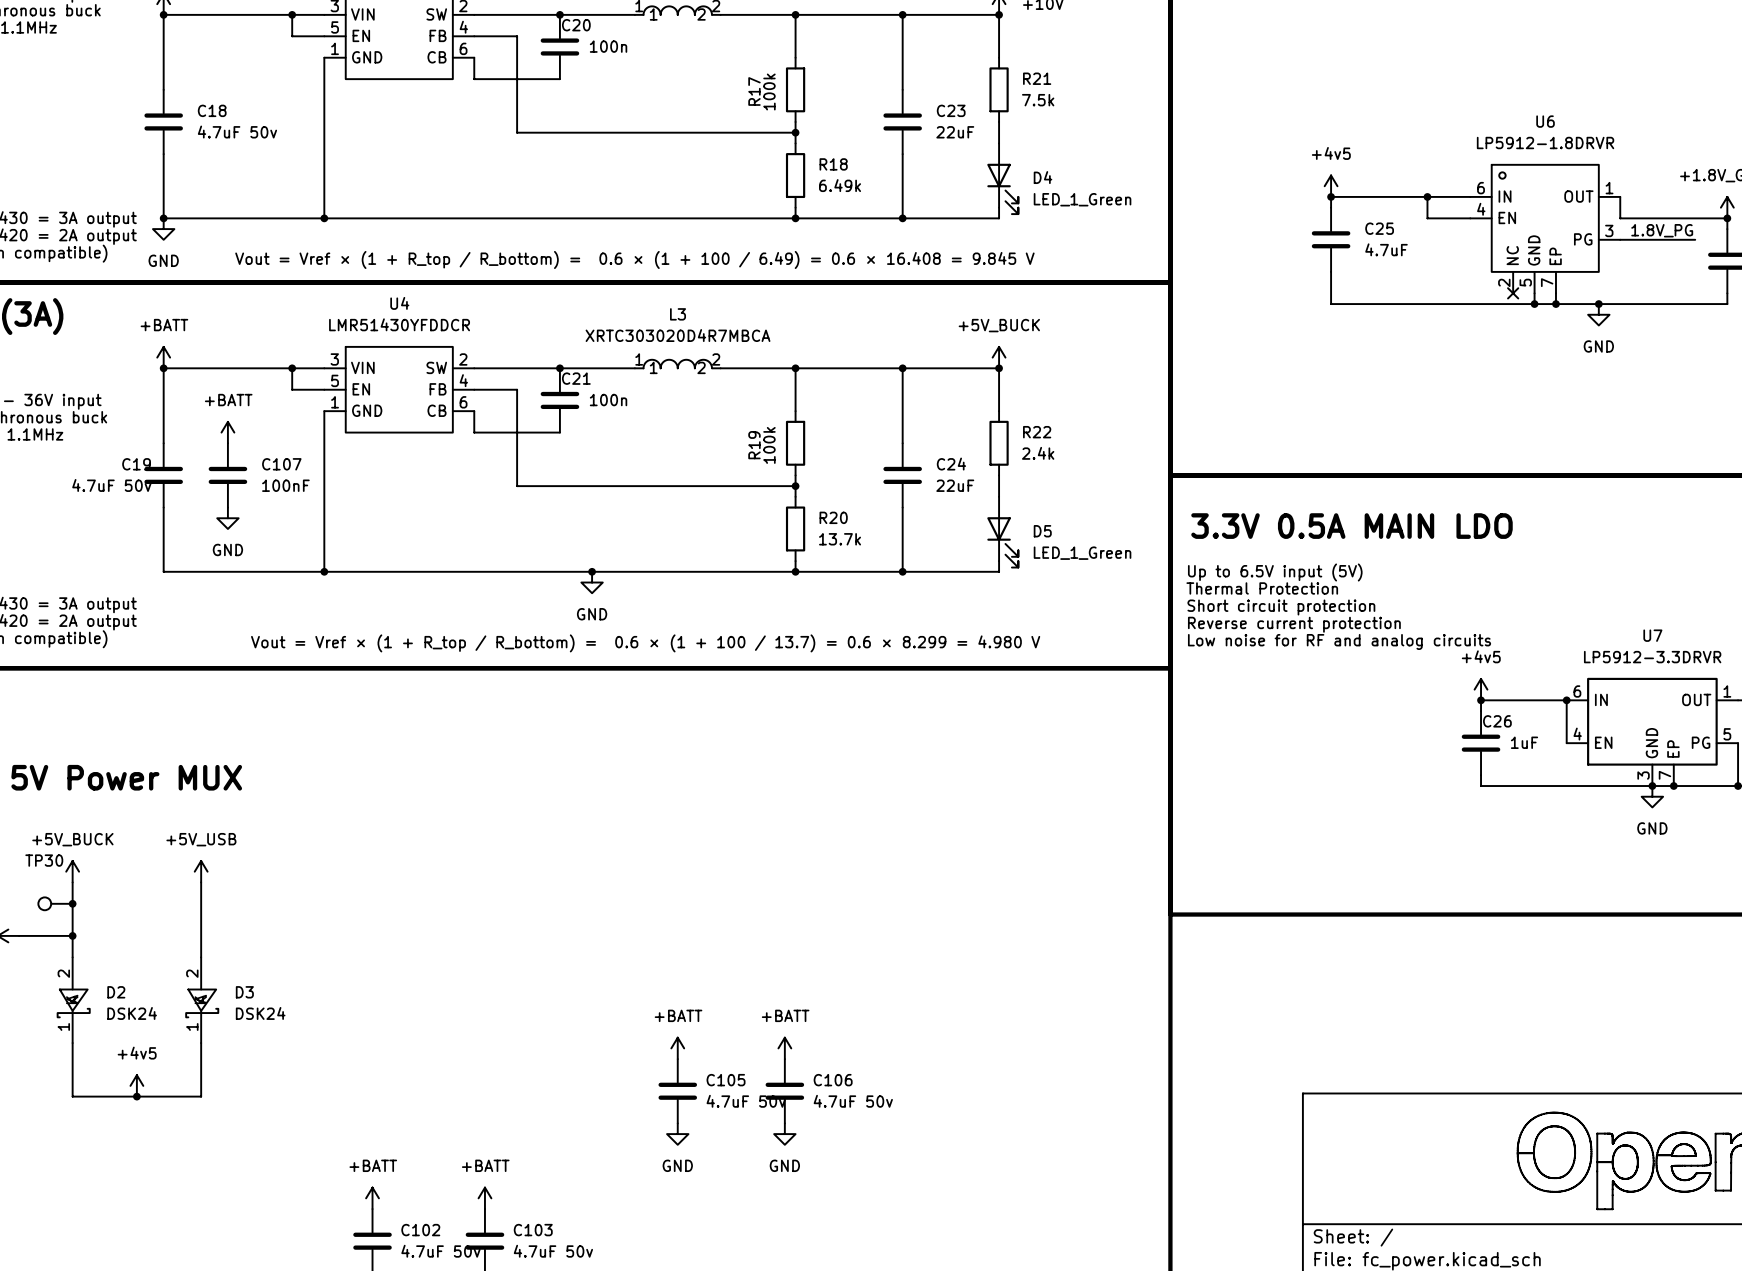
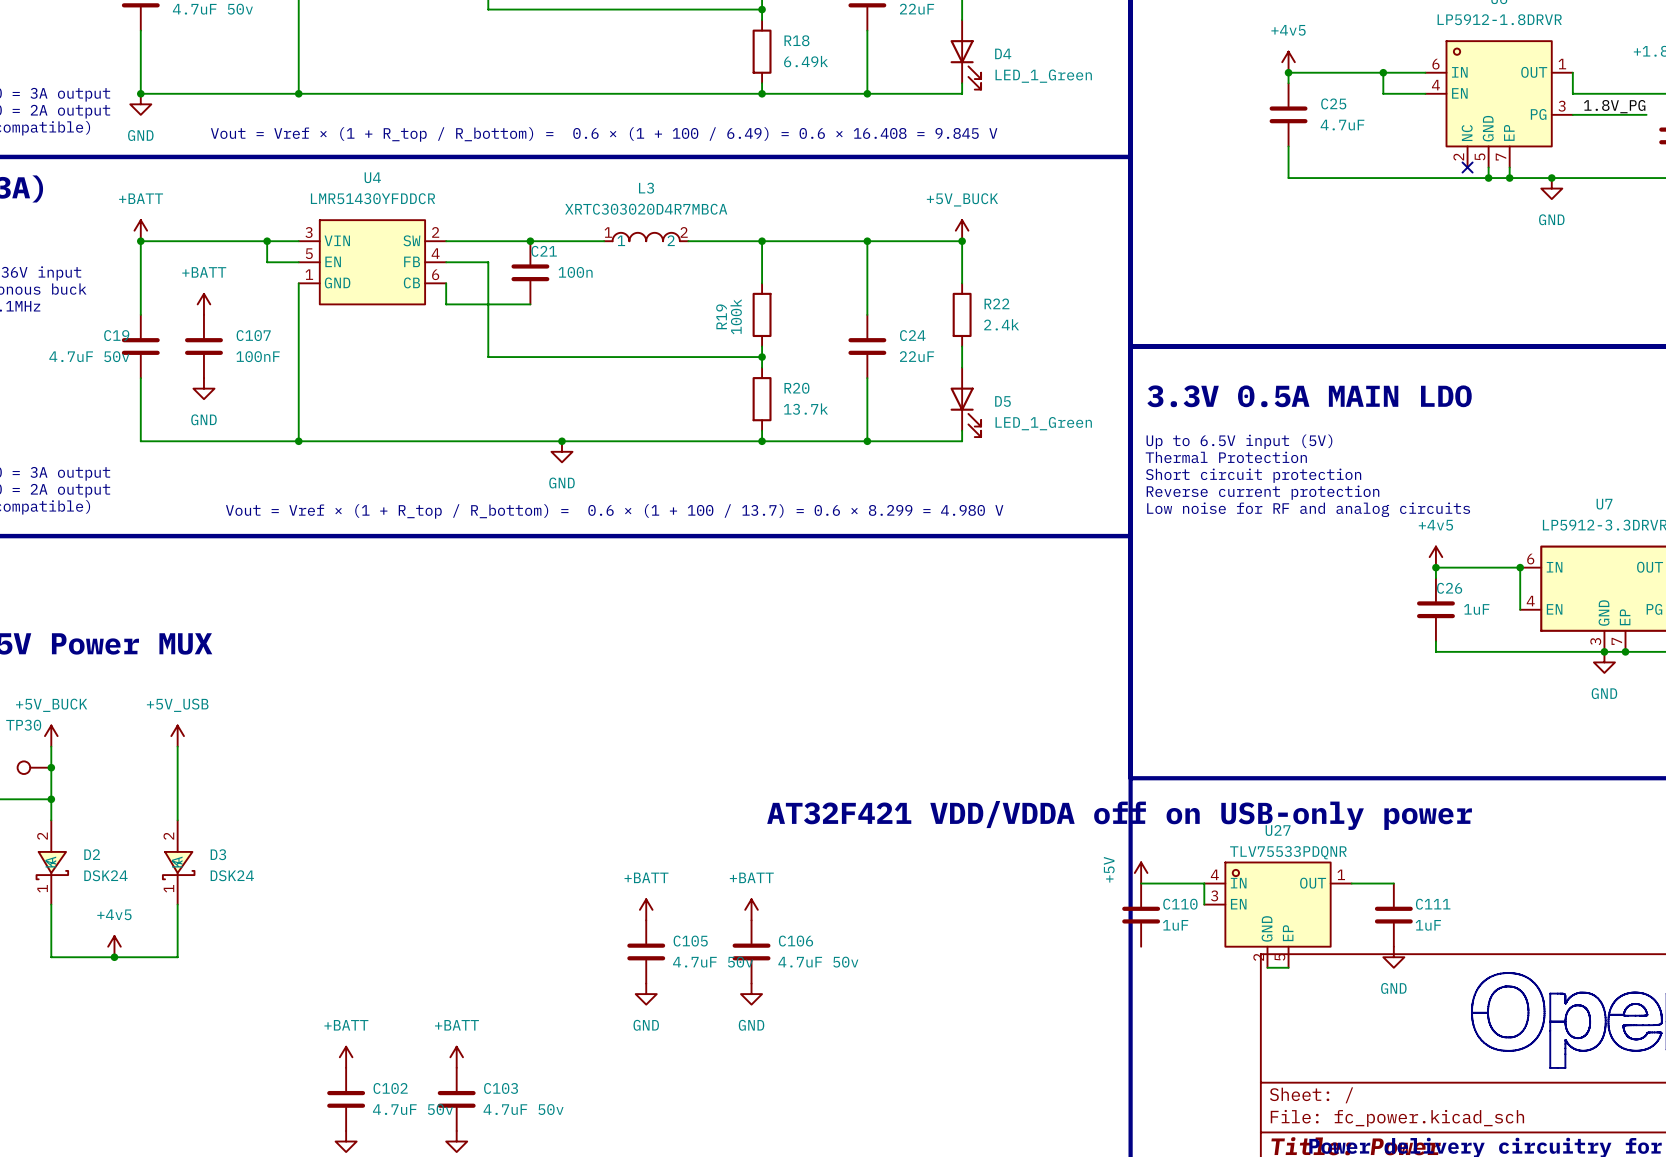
text: none -> AT32F421 VDD/VDDA off on USB-only power (1119, 815)
power symbol: none -> +5V (1141, 873)
wire: none -> (1141, 883) (1204, 883) (1204, 904)
wire: none -> (1351, 883) (1393, 883)
C110: none -> 1uF (1141, 915)
U27: none -> TLV75533PDQNR (1278, 915)
C111: none -> 1uF (1393, 915)
power symbol: none -> GND (1393, 957)
wire: none -> (1267, 967) (1288, 967)

